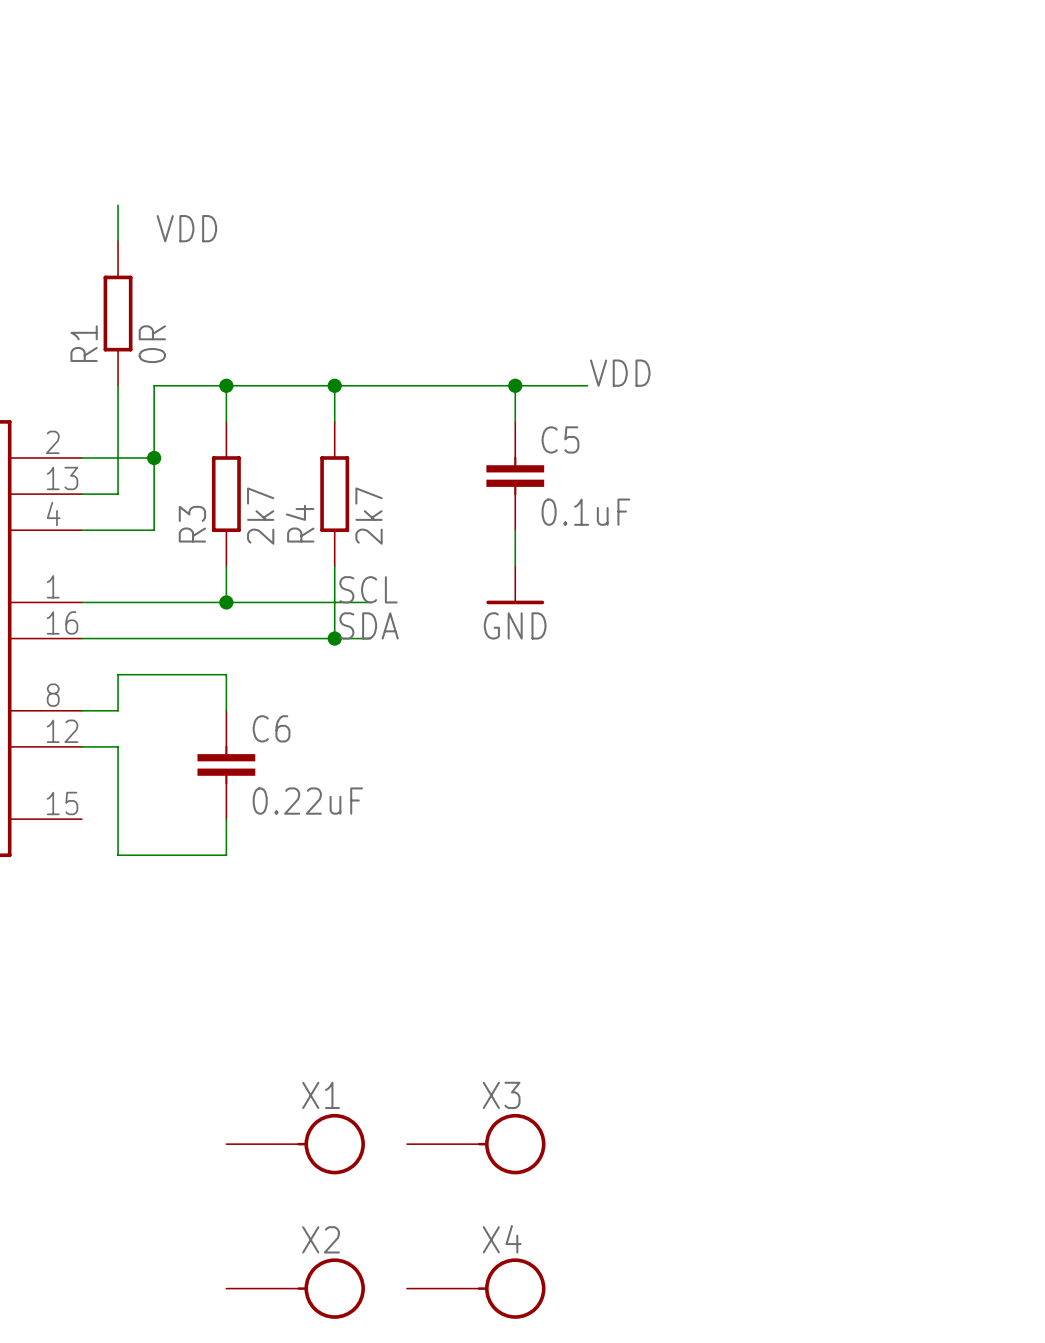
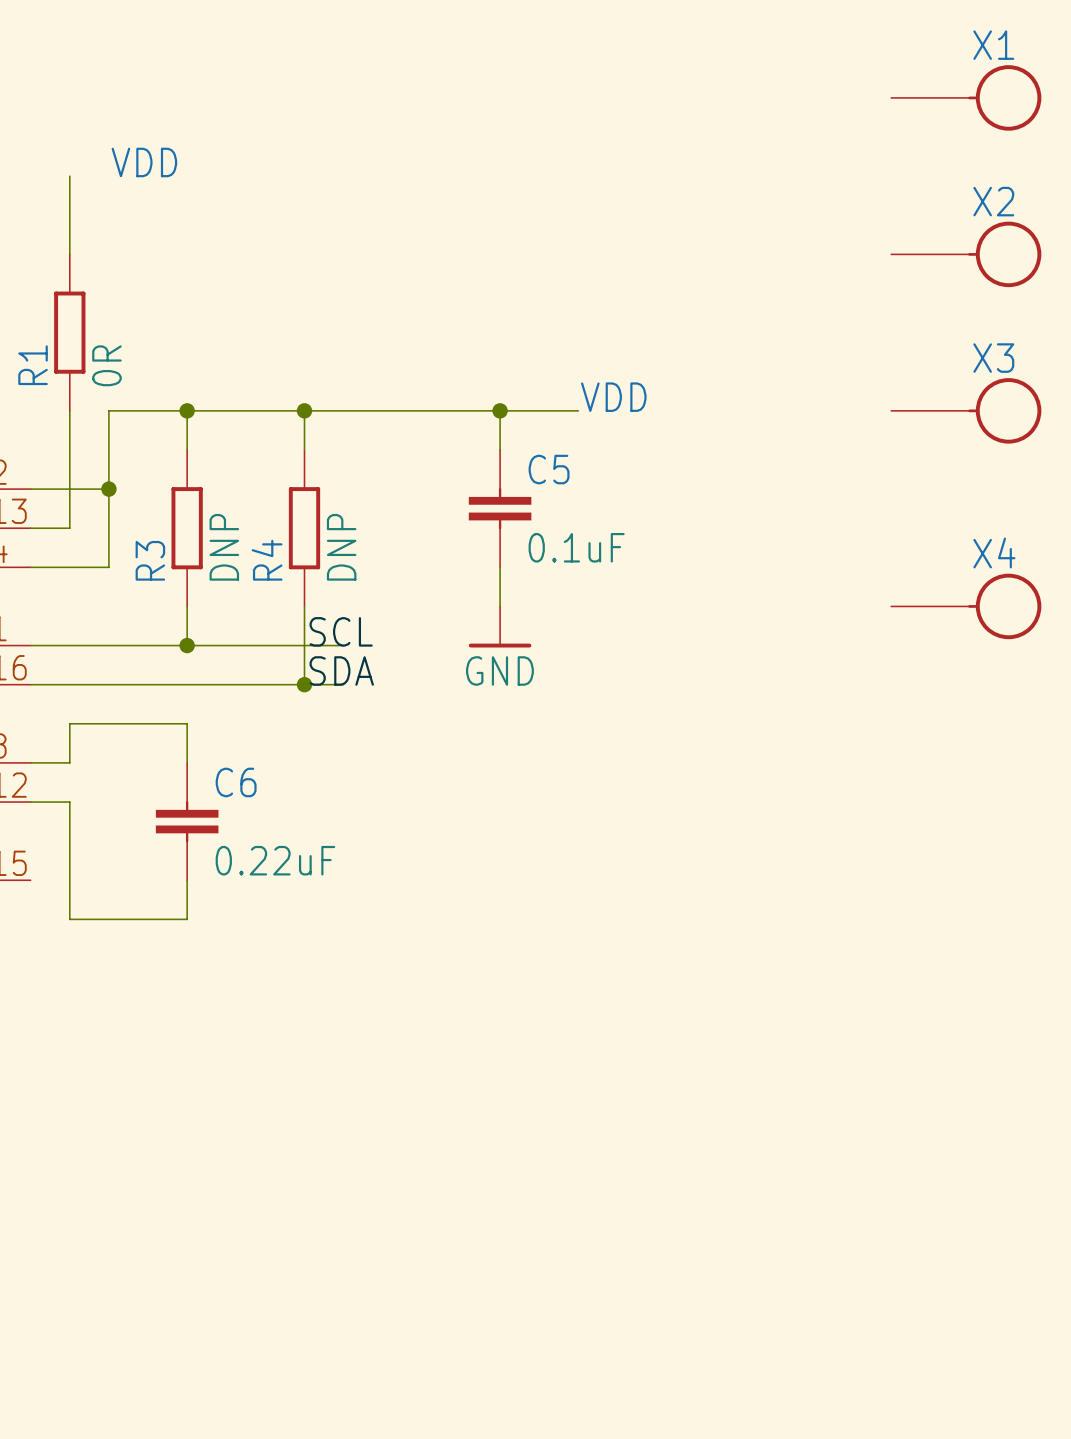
wire: none -> (69, 176) (69, 215)
text position: VDD (186, 228) -> VDD (144, 162)
R3 value: 2k7 (260, 516) -> DNP (224, 547)
R4 value: 2k7 (369, 516) -> DNP (341, 547)
X1 position: (295, 1144) -> (966, 97)
X3 position: (476, 1144) -> (966, 410)
X2 position: (295, 1288) -> (966, 254)
X4 position: (476, 1288) -> (966, 606)

